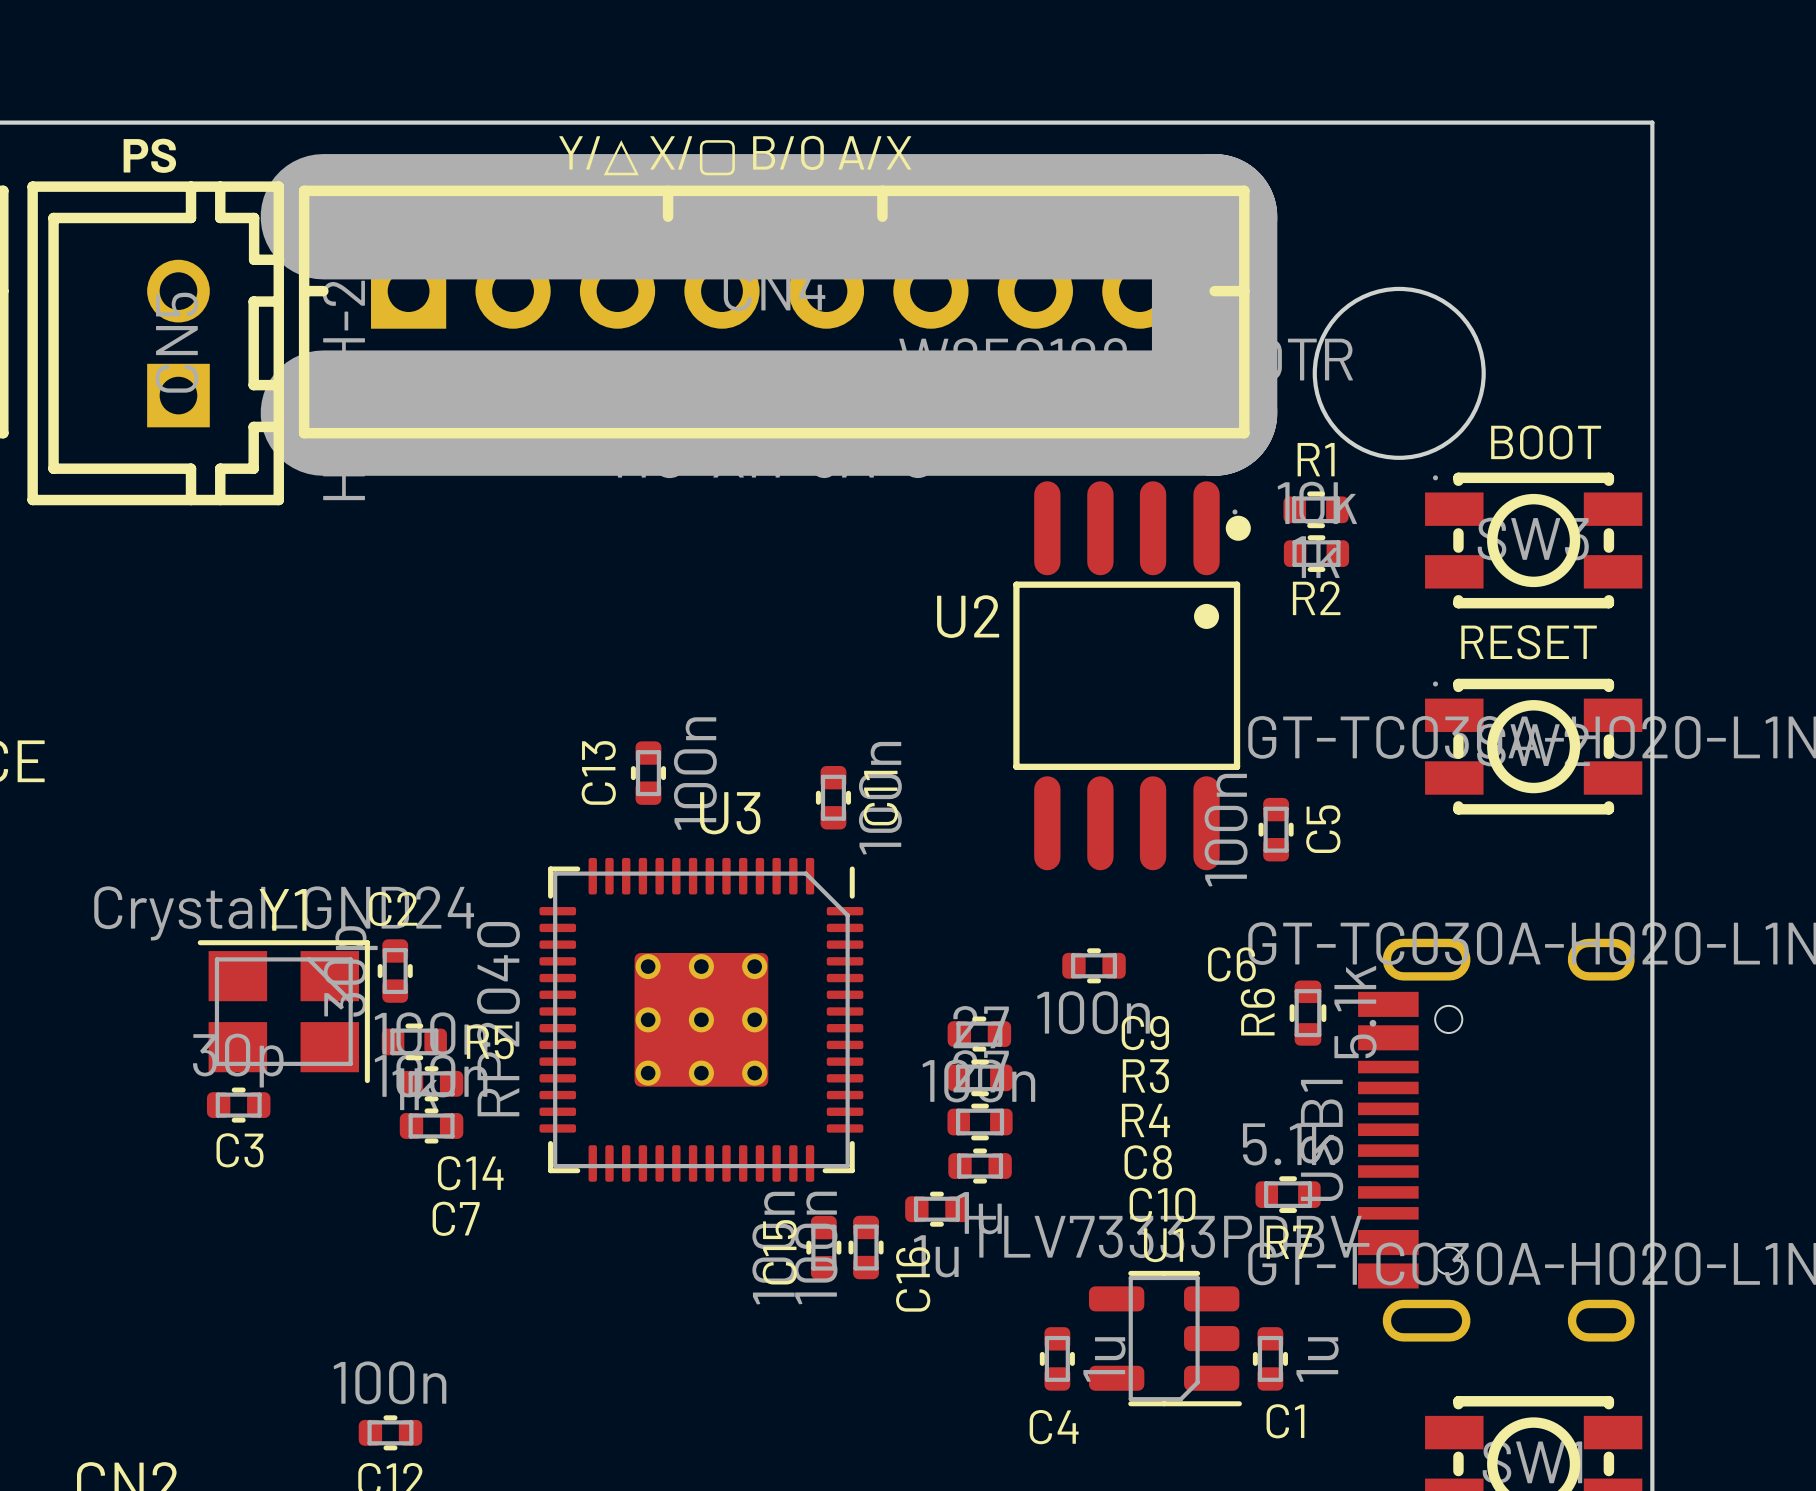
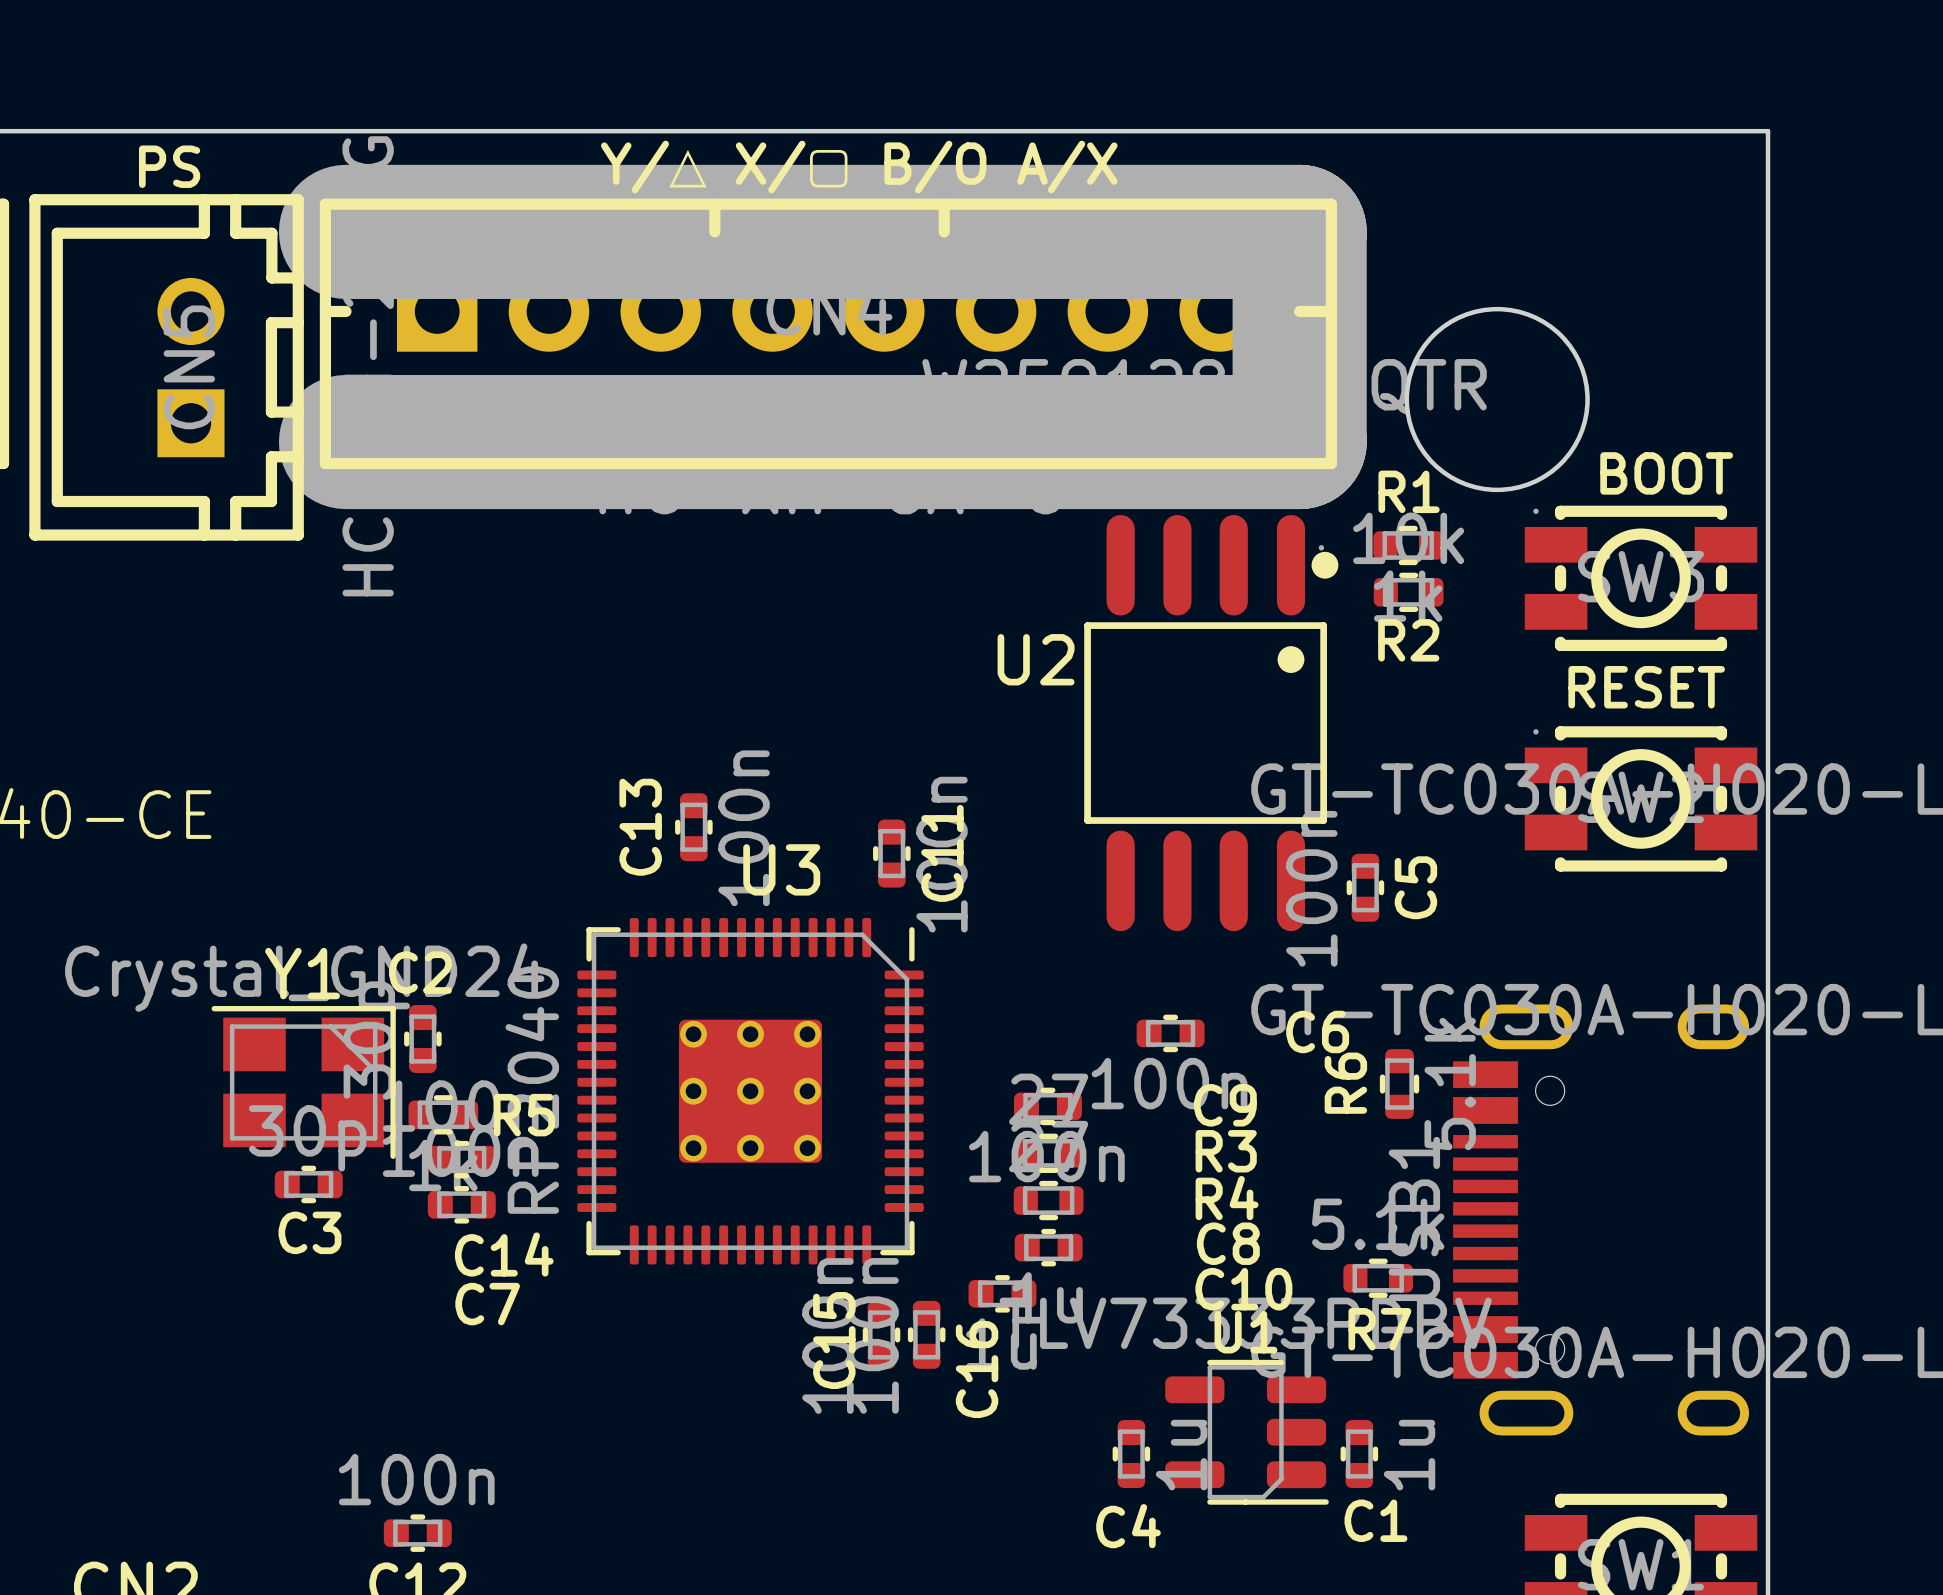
C3 position: (238, 1105) -> (308, 1184)

